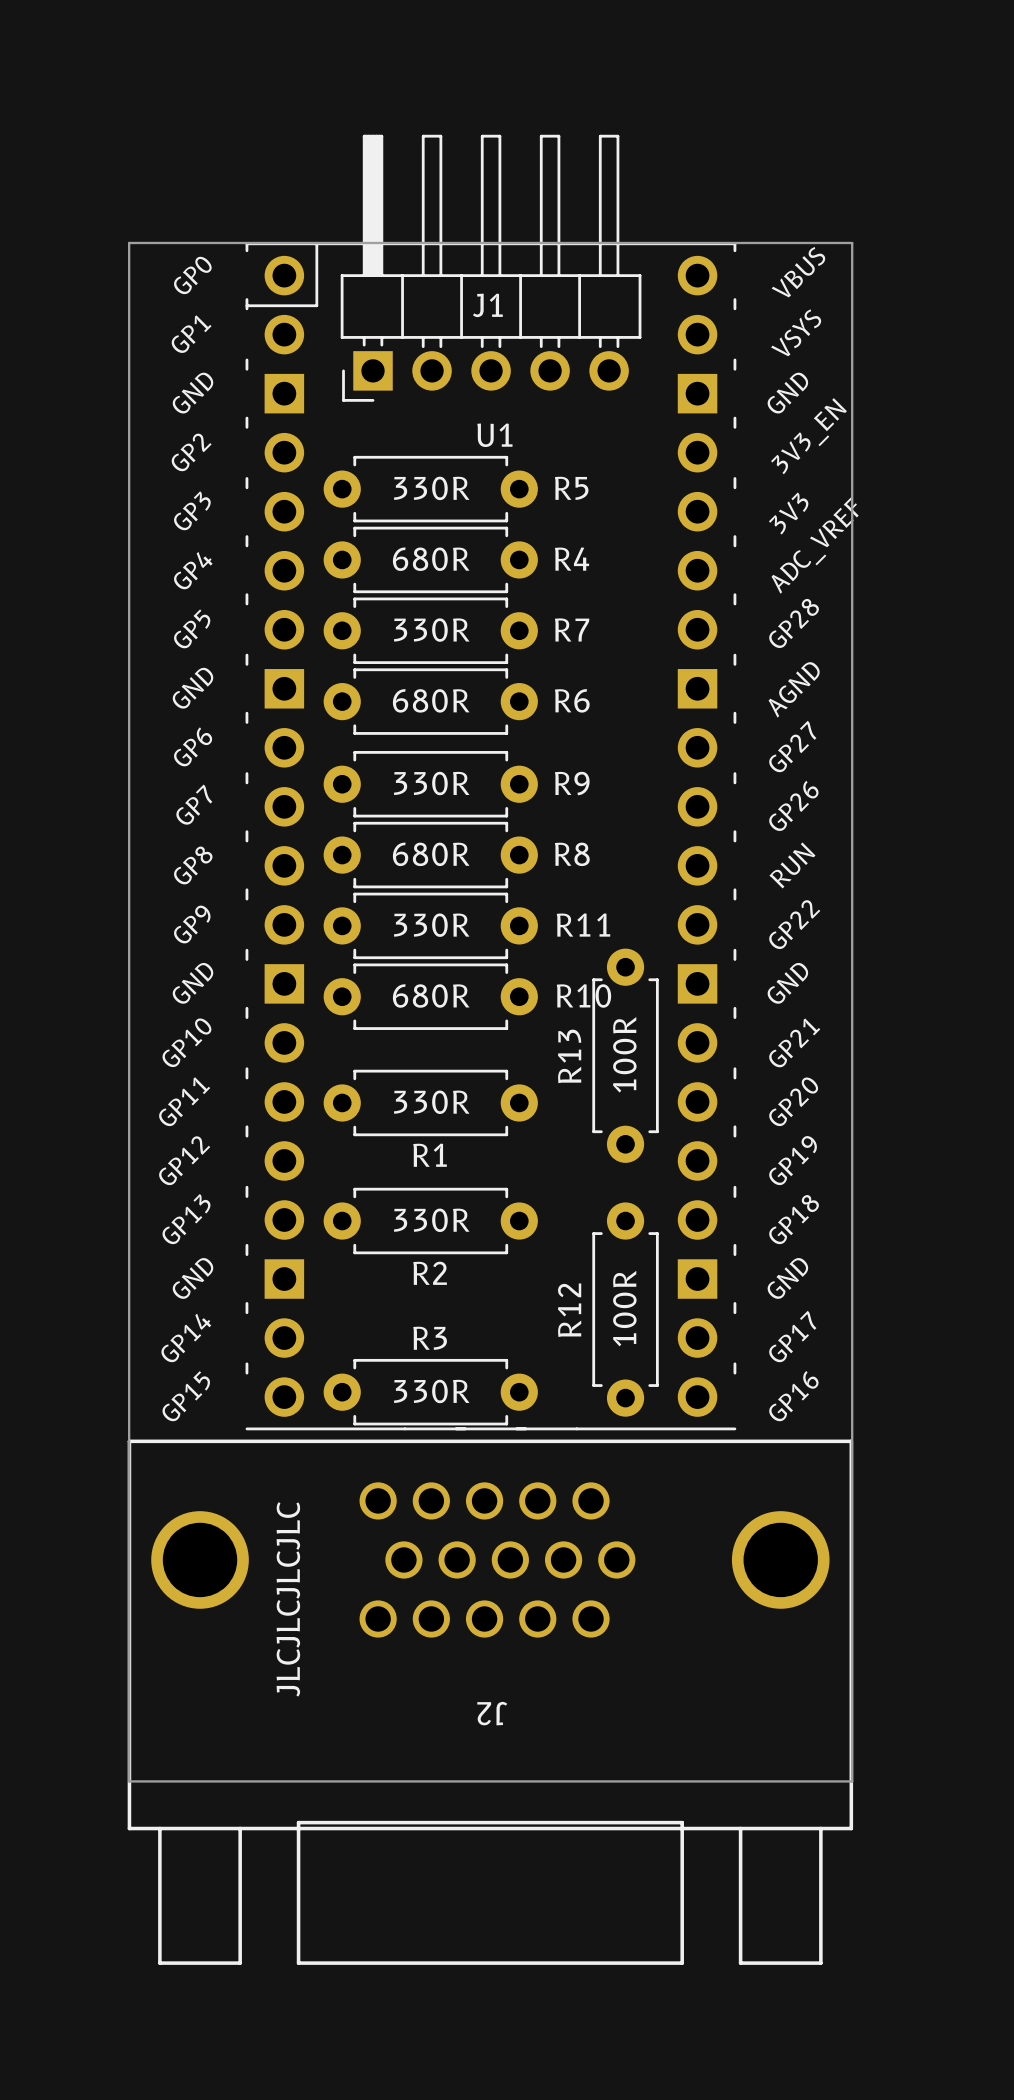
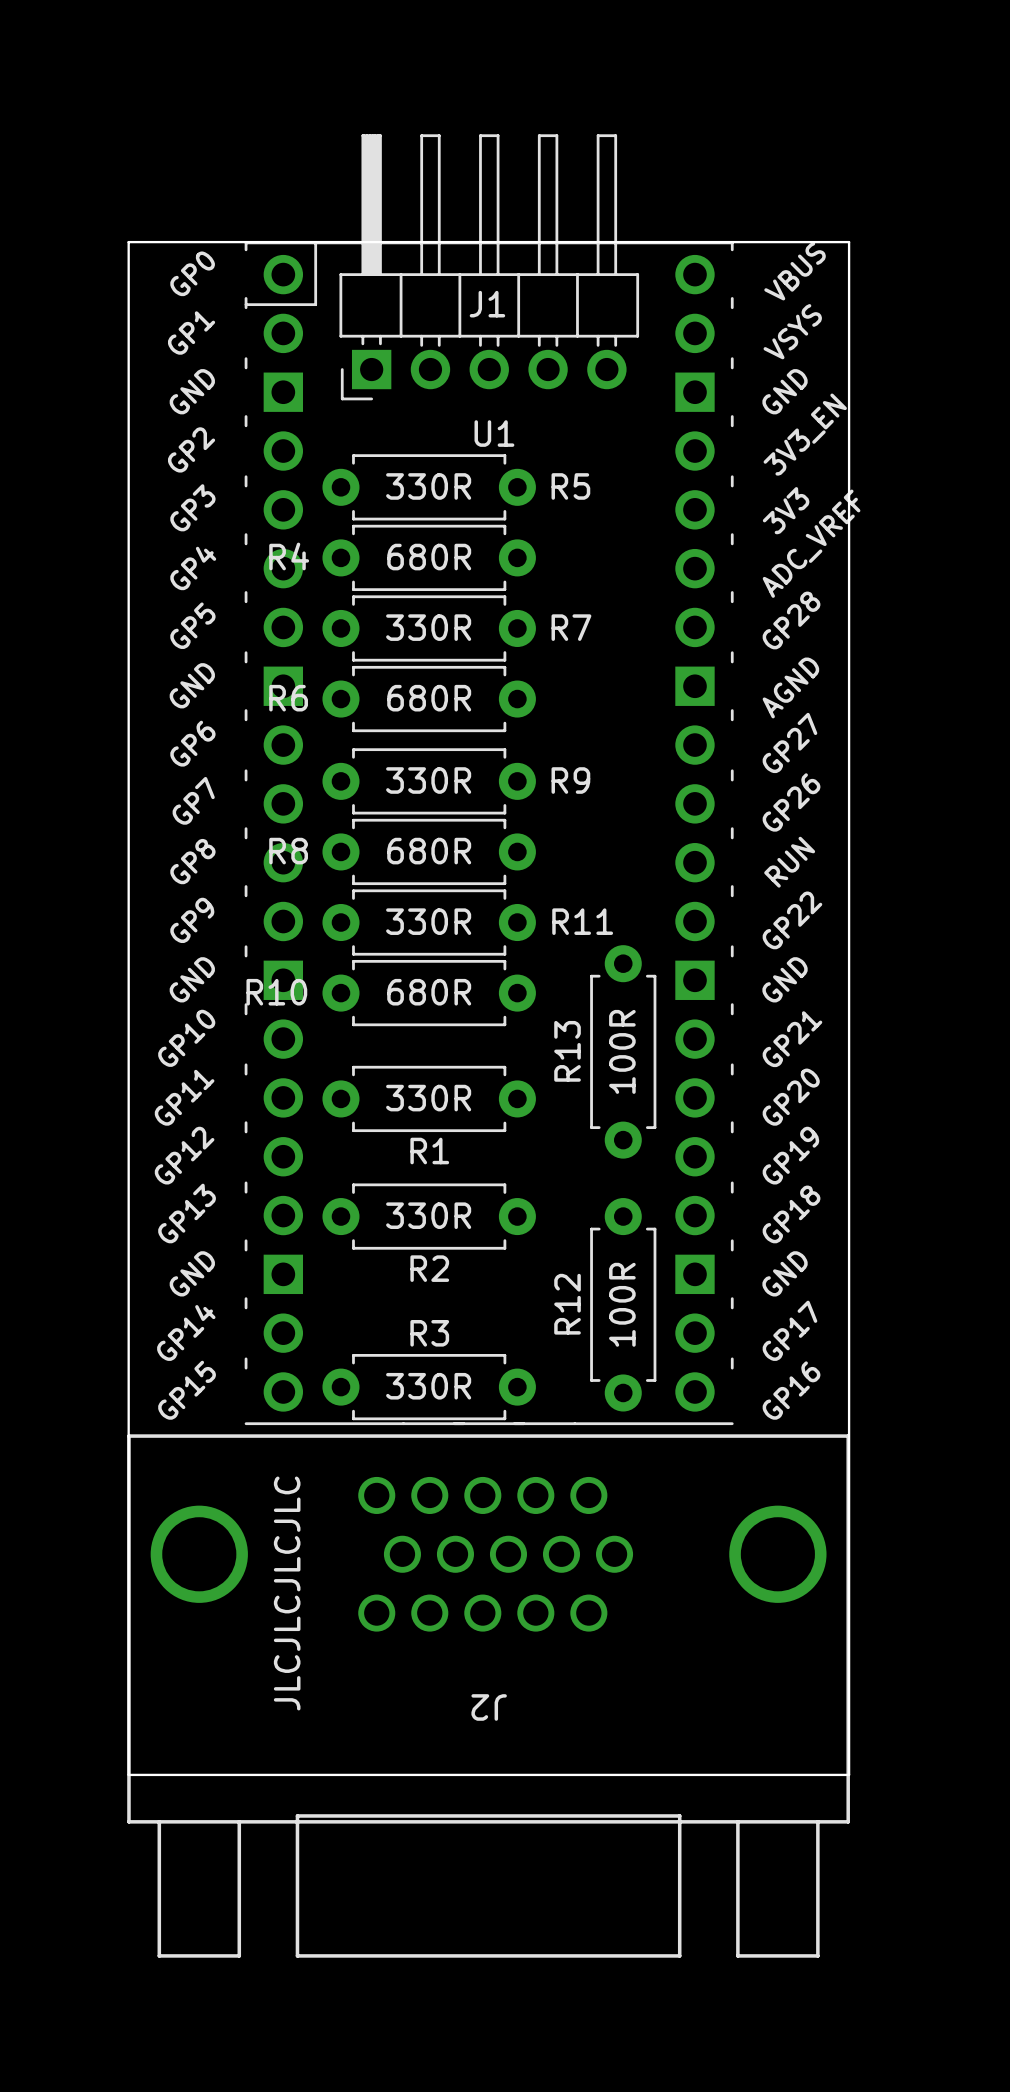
R4 name position: R4 (572, 559) -> R4 (289, 556)
R6 name position: R6 (572, 700) -> R6 (288, 698)
R8 name position: R8 (572, 854) -> R8 (288, 851)
R10 name position: R10 (583, 995) -> R10 (276, 992)

